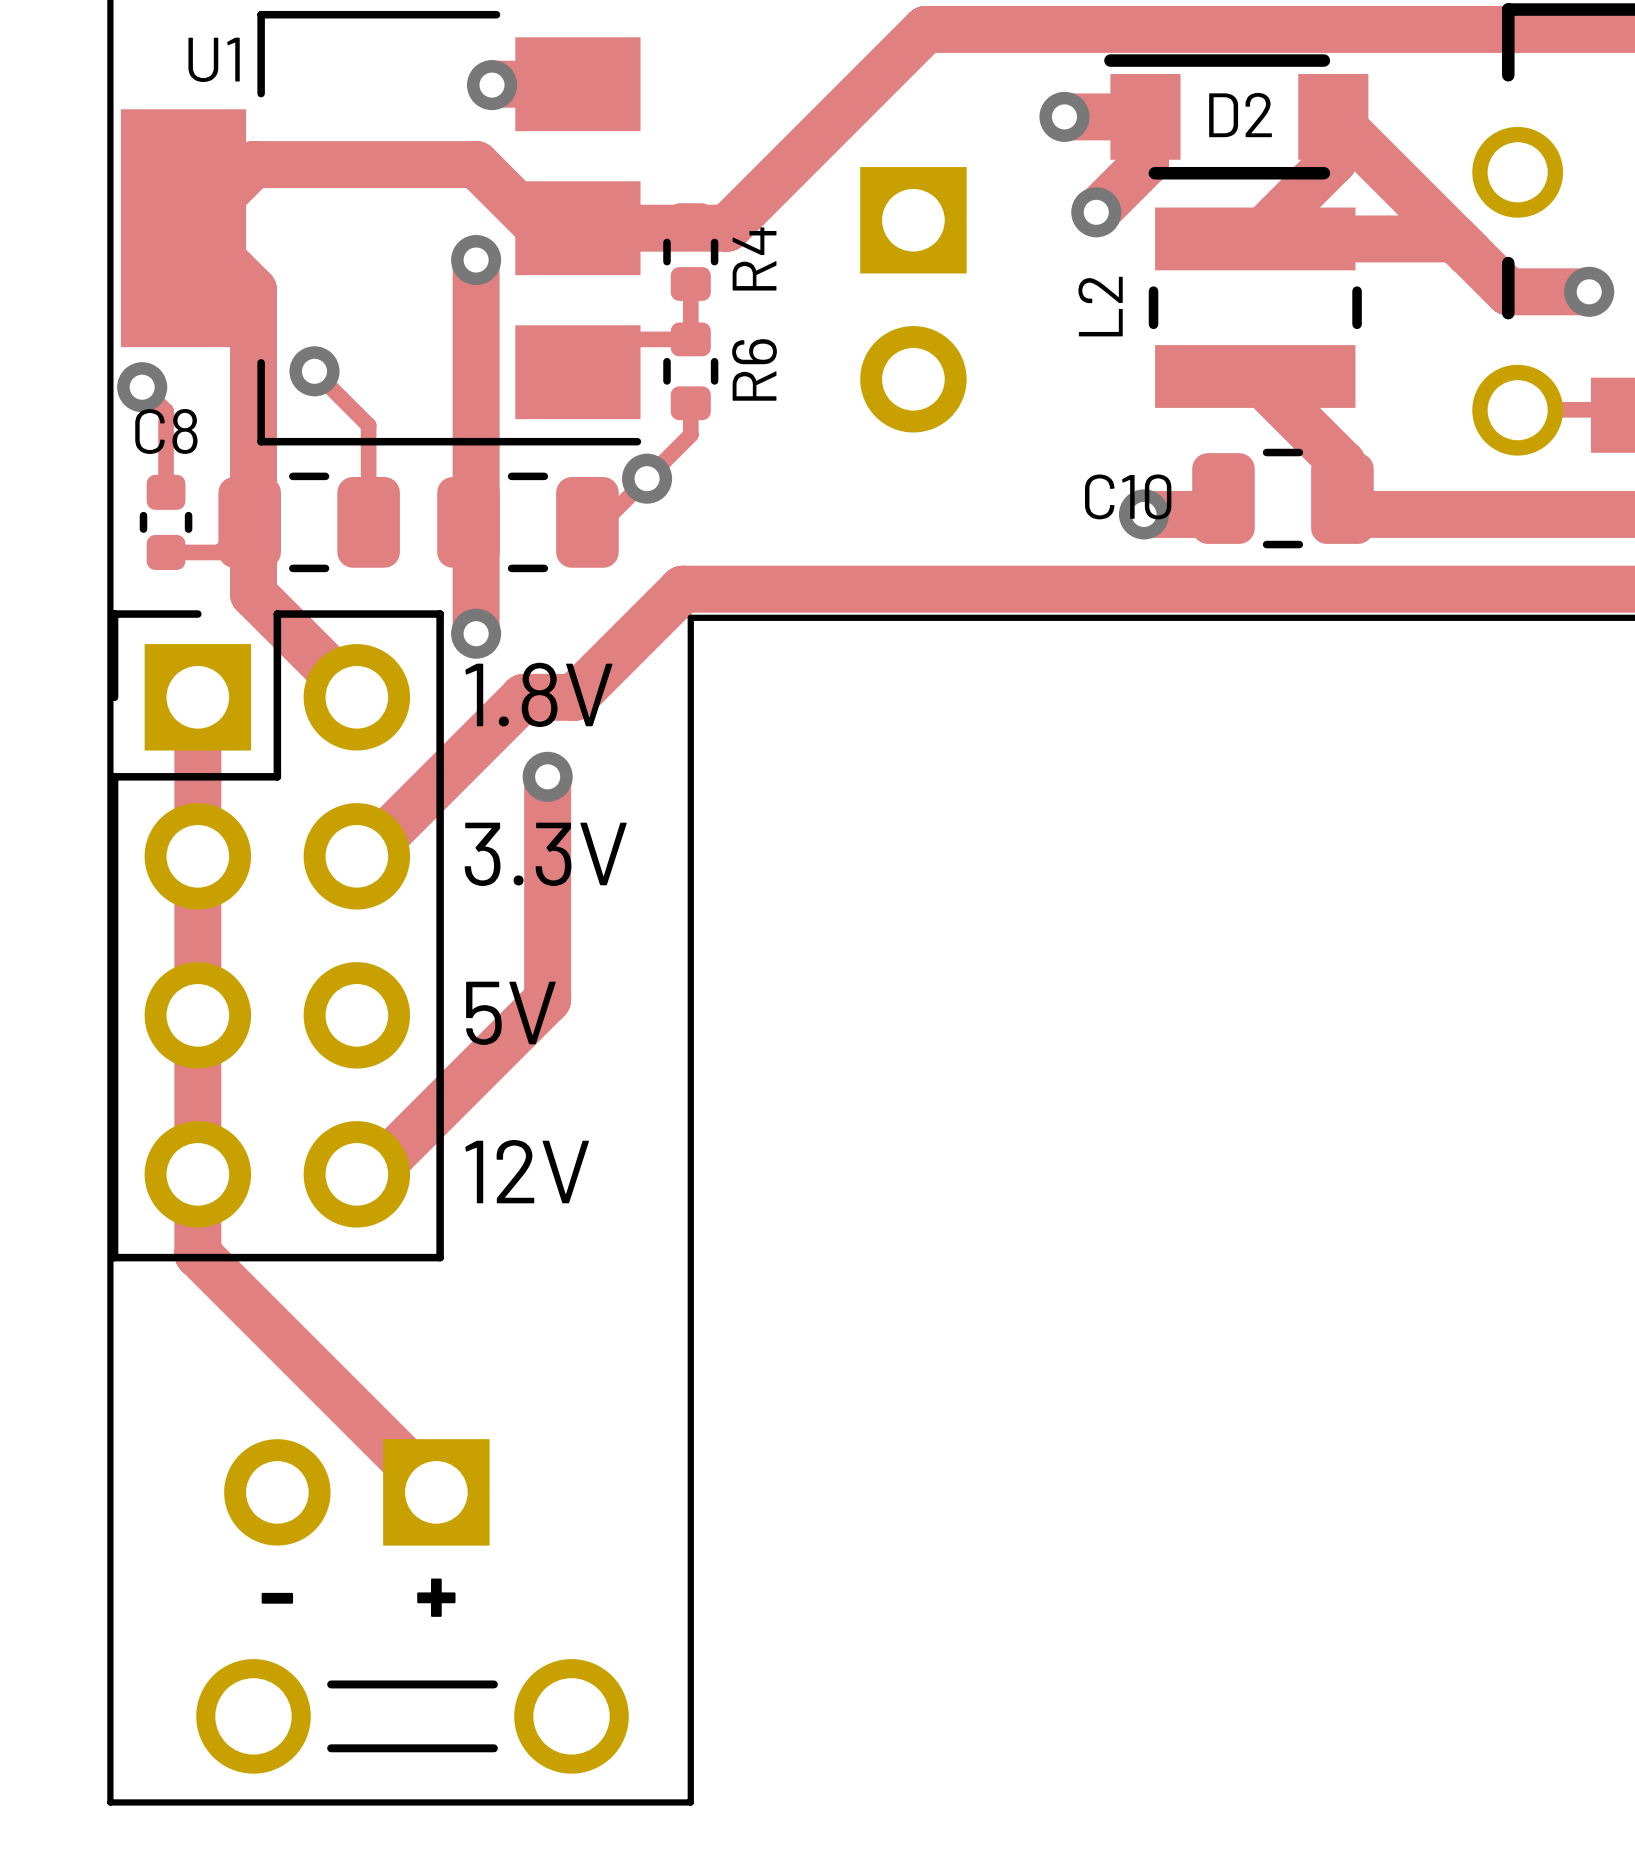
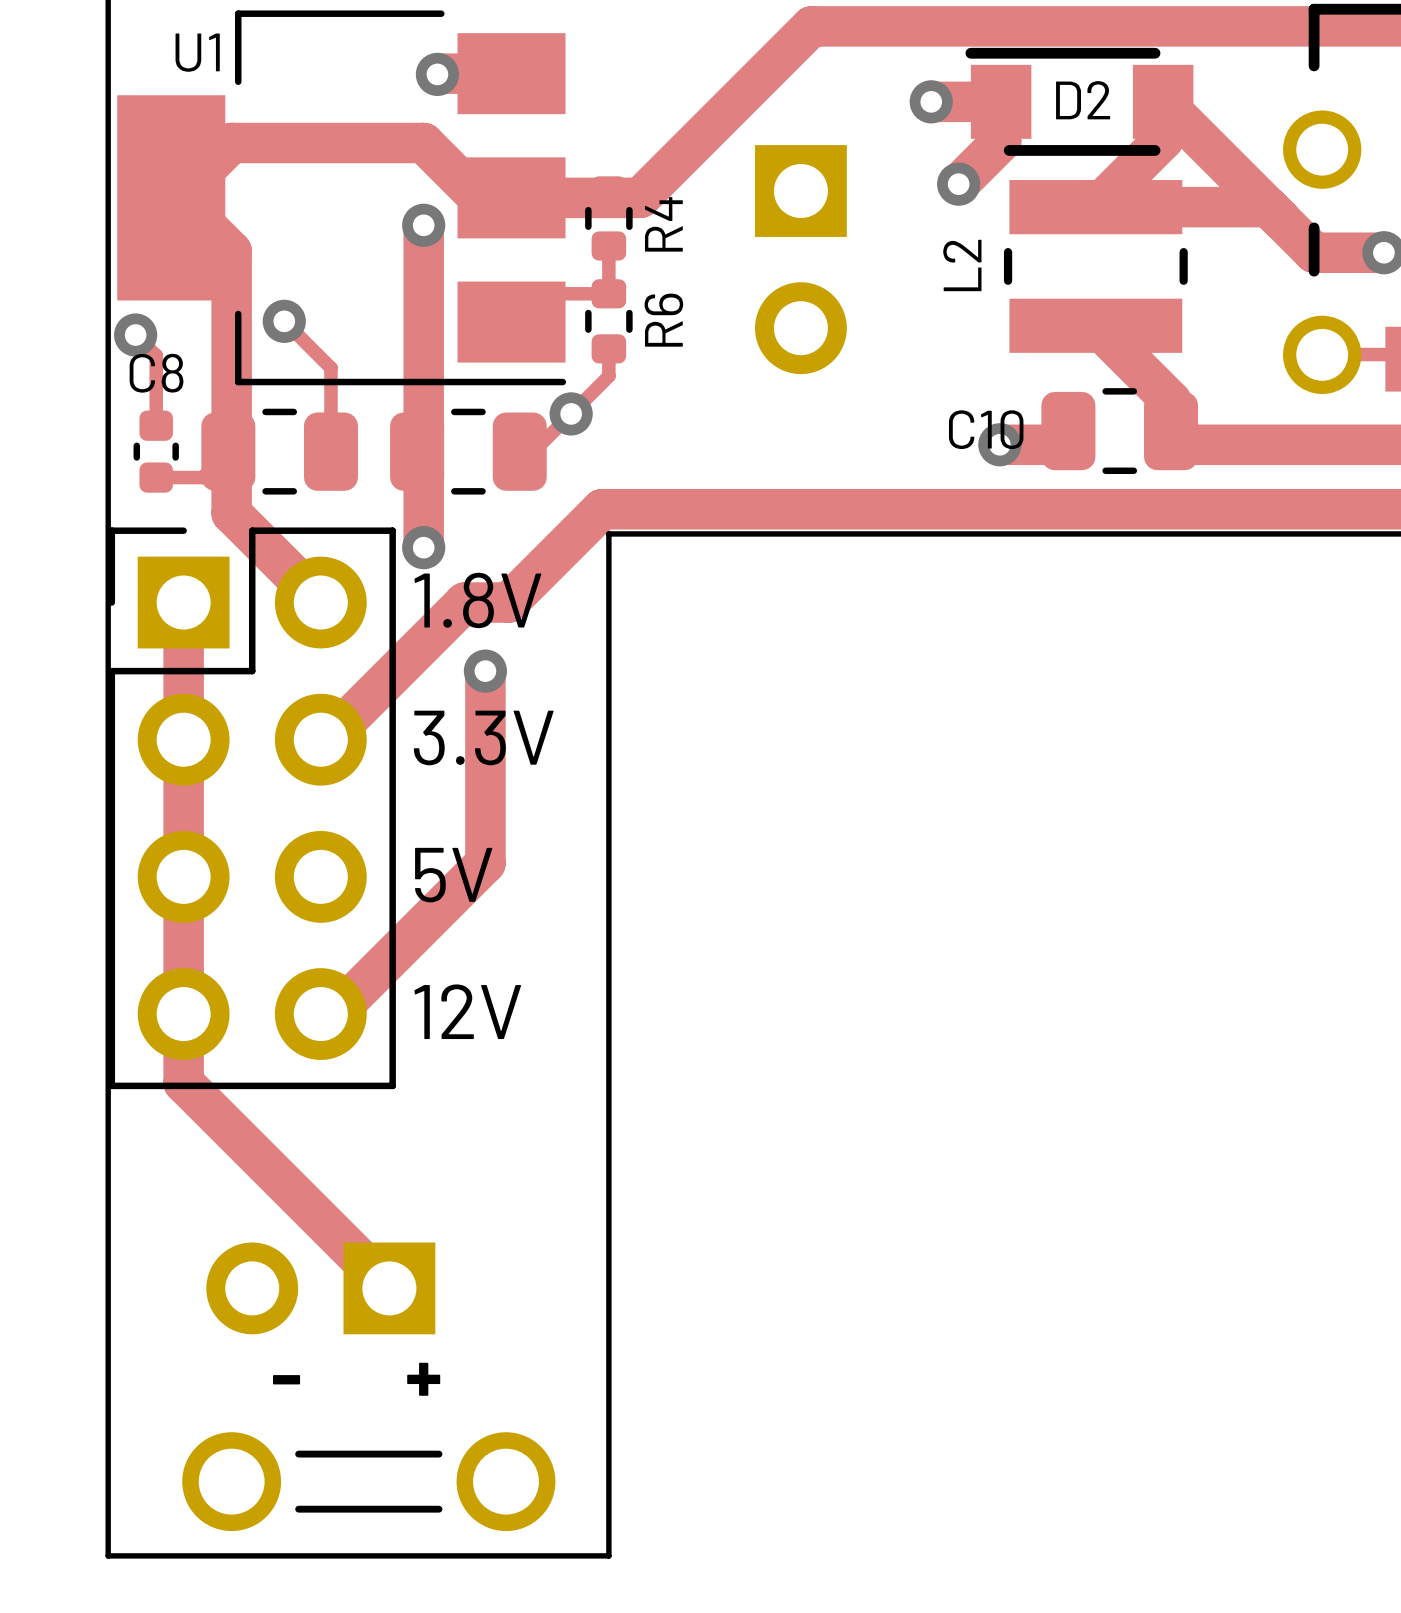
text position: + (436, 1597) -> + (423, 1379)
text position: - (277, 1598) -> - (286, 1379)

